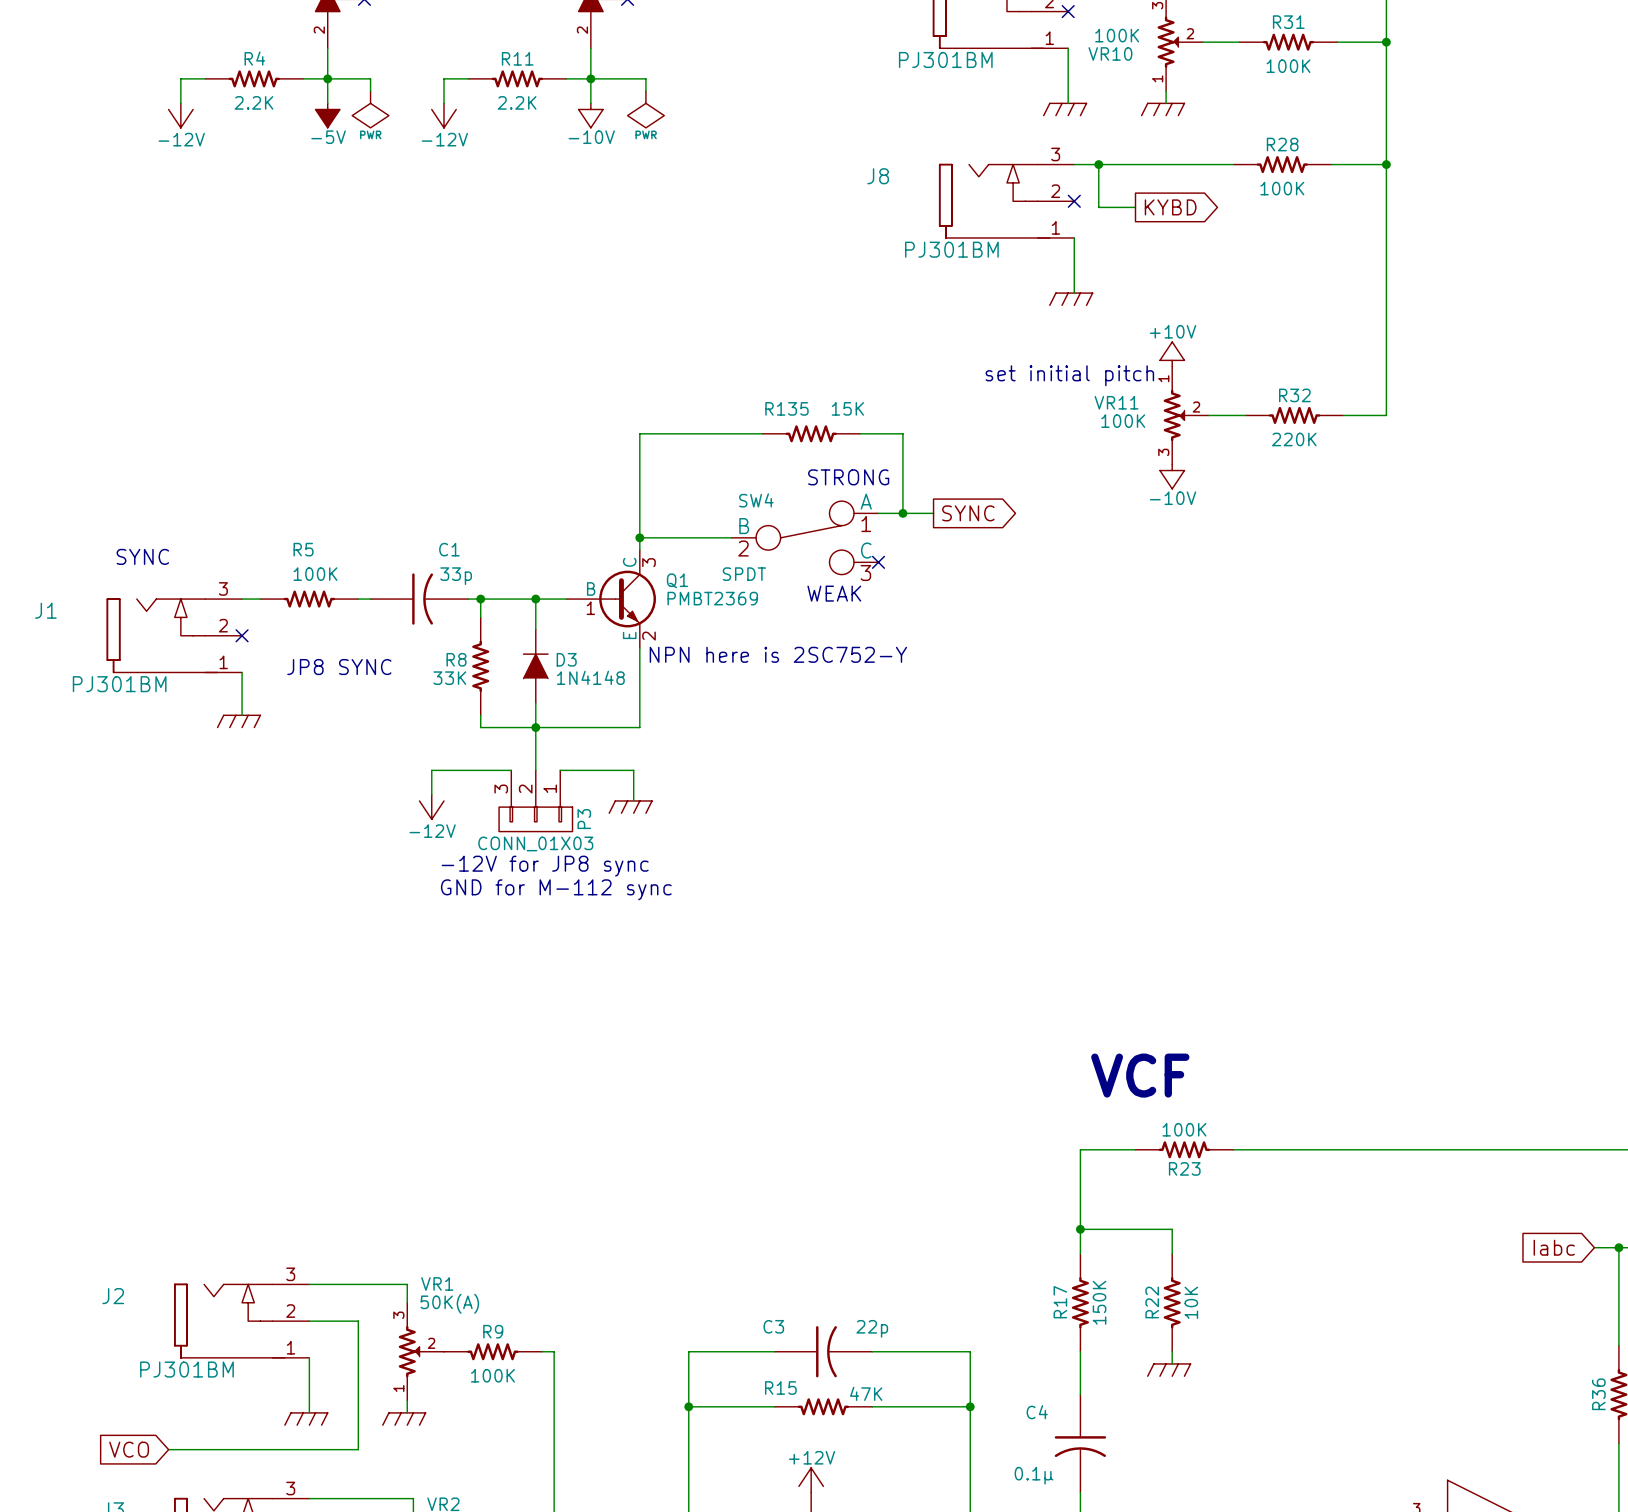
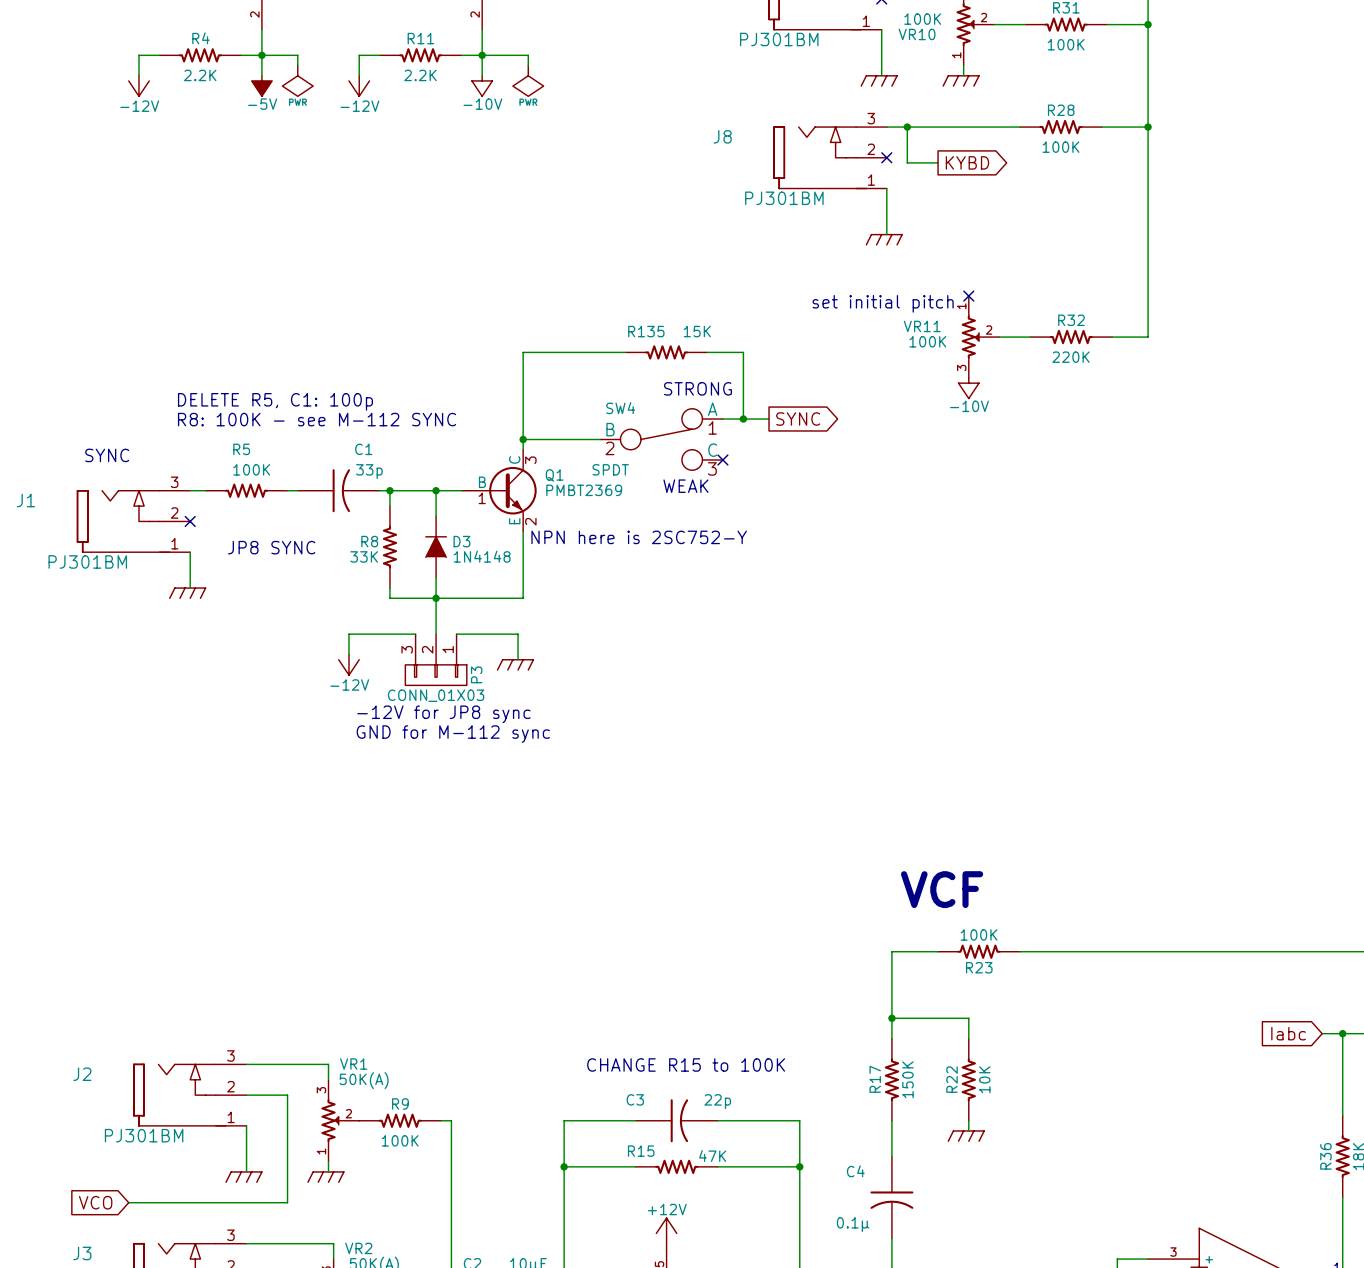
power symbol: +10V (1172, 354) -> none
no-connect mark: none -> (968, 296)
text: none -> DELETE R5, C1: 100p (275, 401)
text: none -> R8: 100K - see M-112 SYNC (317, 419)
text: none -> CHANGE R15 to 100K (686, 1064)

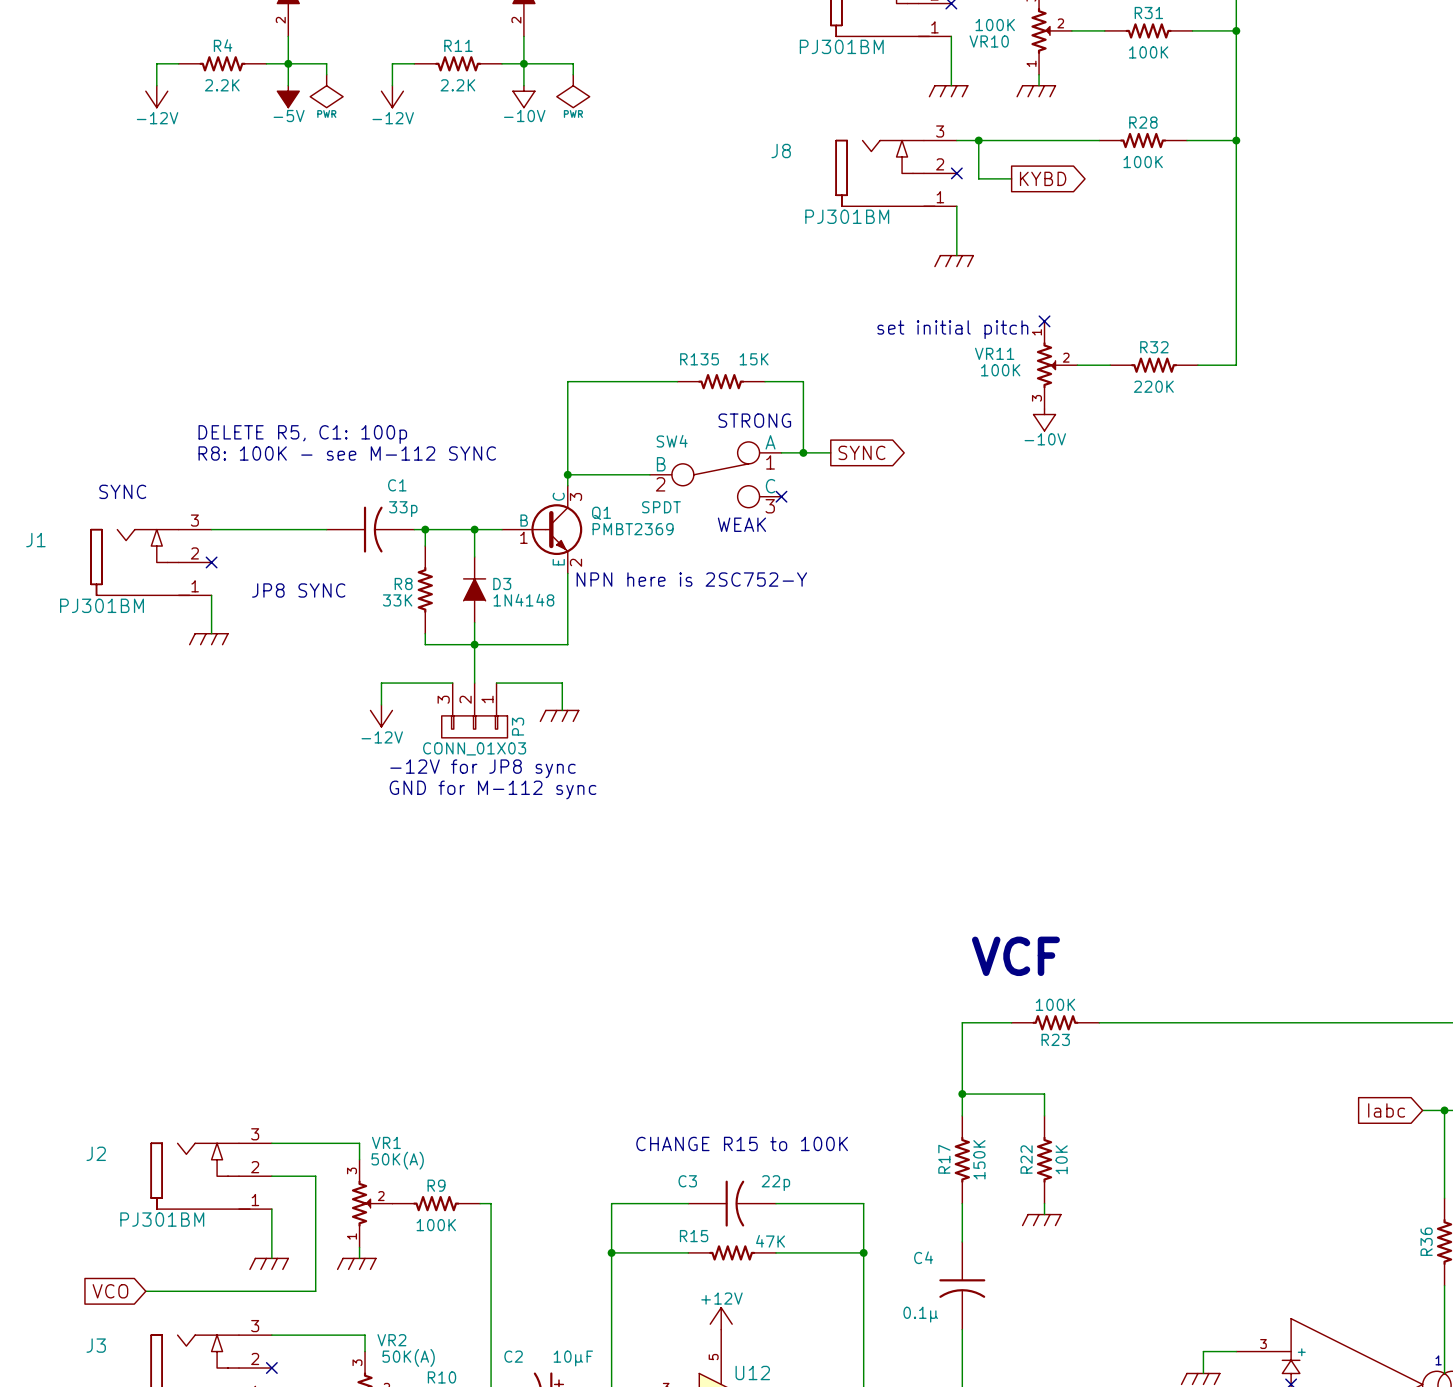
R5: 100K (246, 490) -> none

